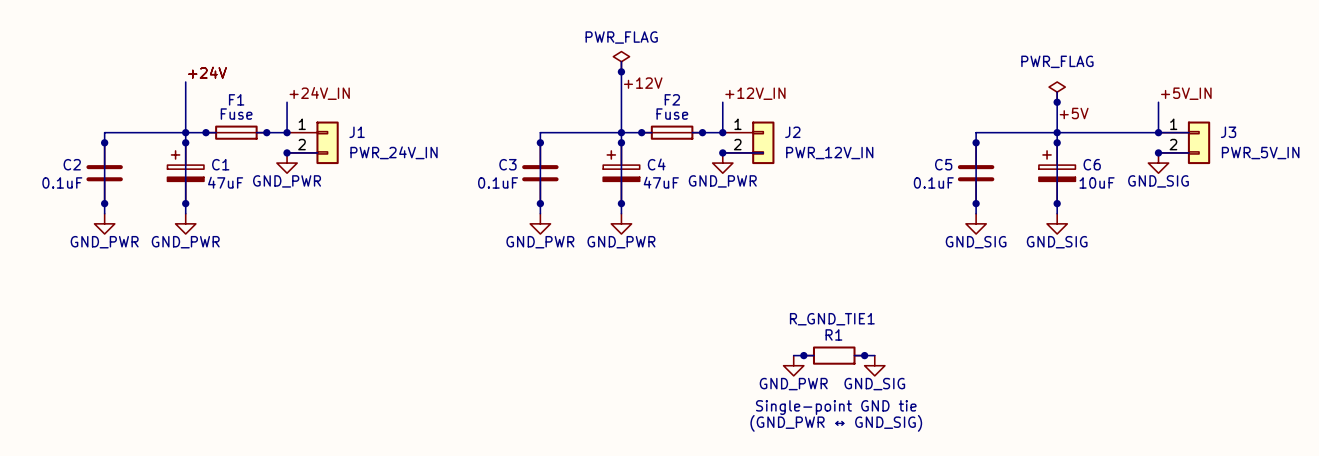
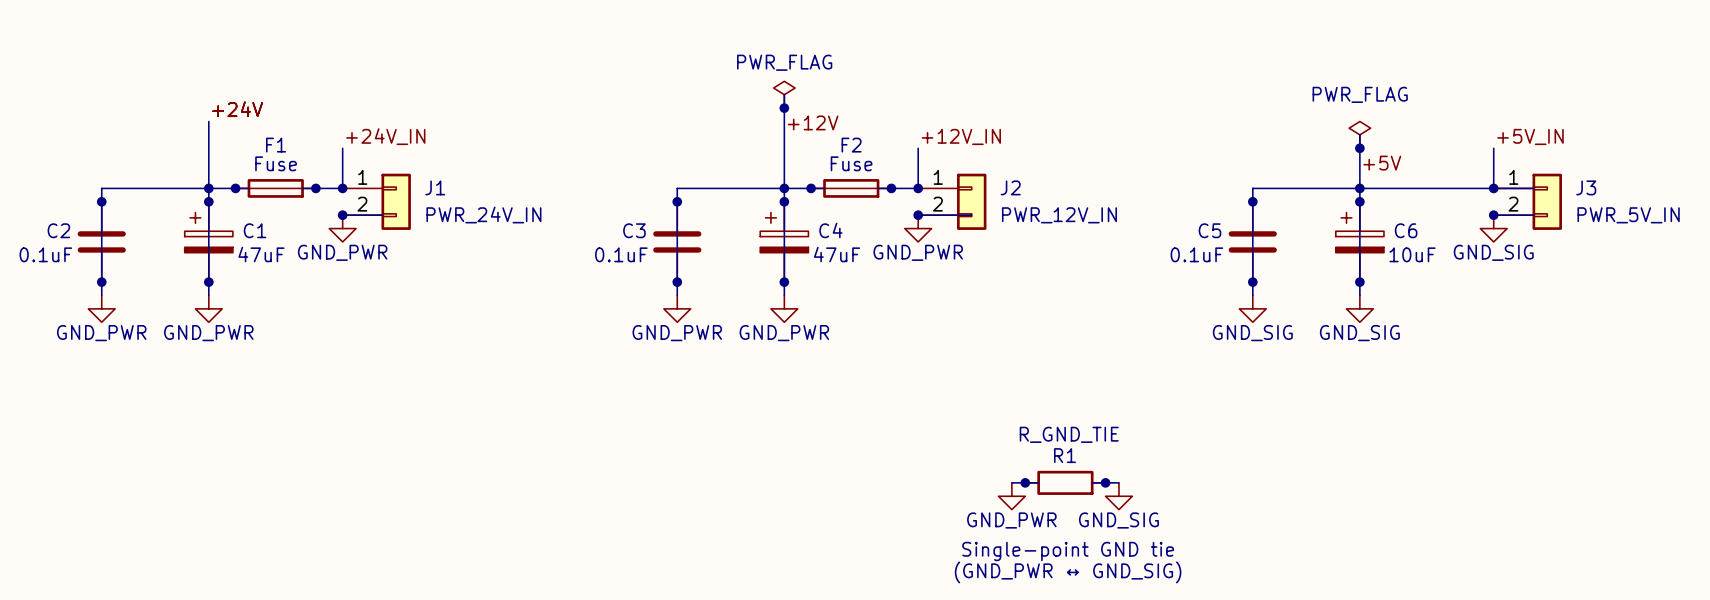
R_GND_TIE1 name: R_GND_TIE1 (832, 319) -> R_GND_TIE (1069, 434)

